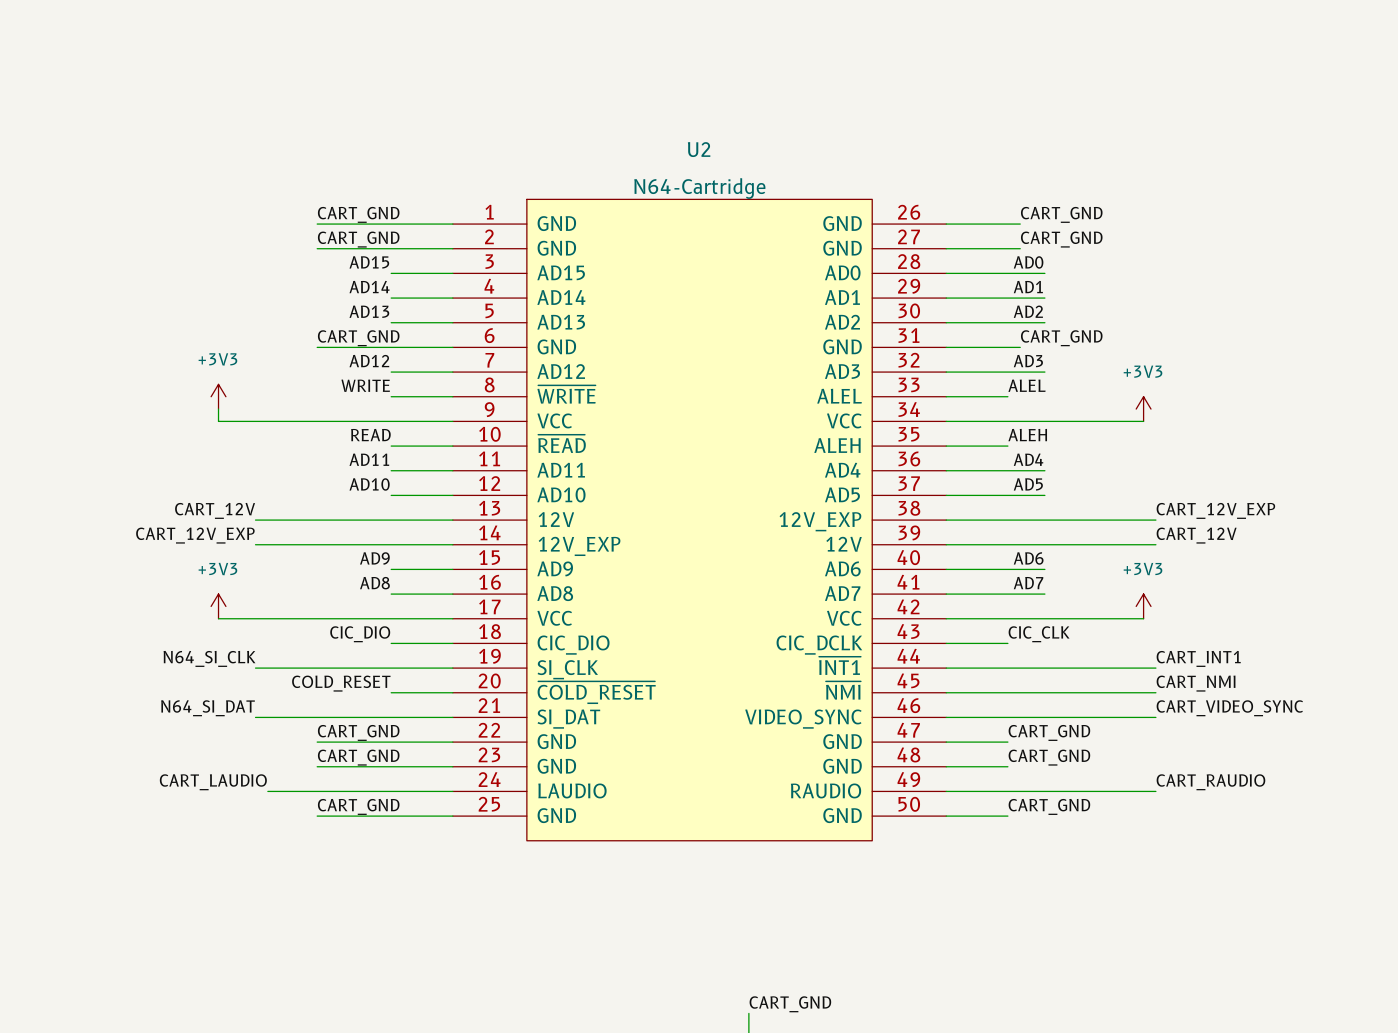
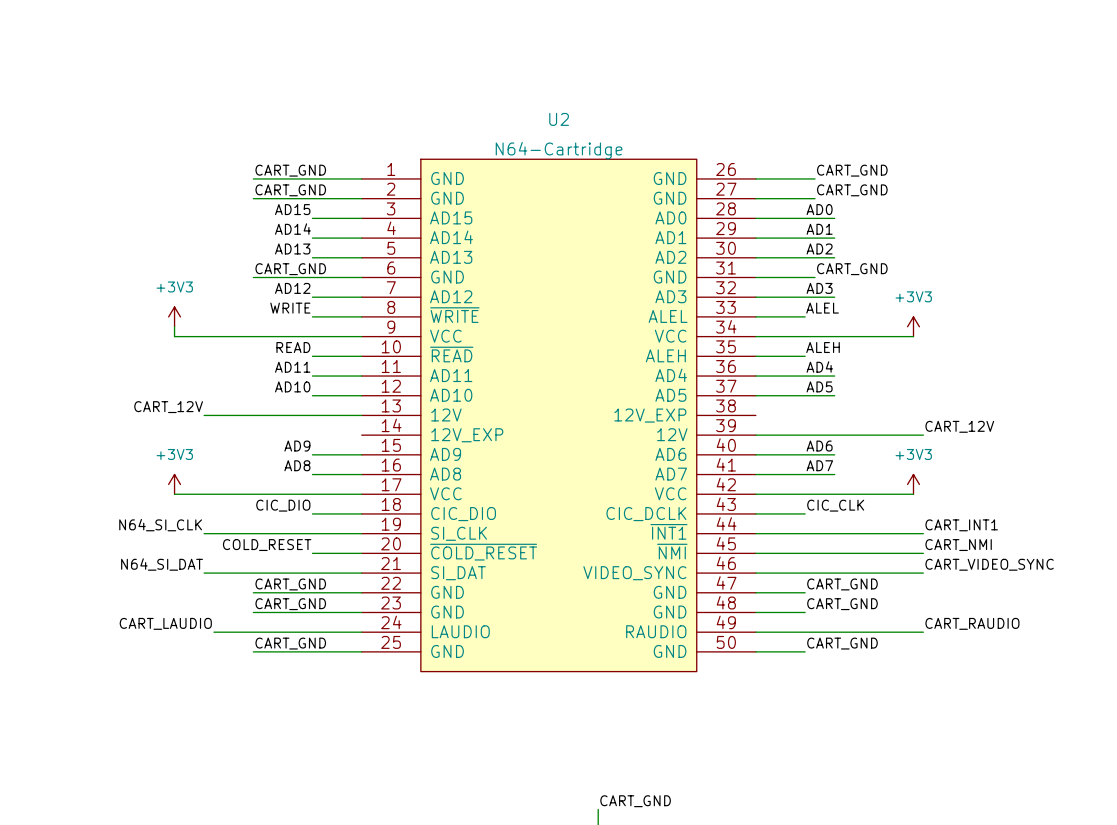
label: CART_12V_EXP (1215, 510) -> none
wire: (946, 520) (1155, 520) -> none
label: CART_12V_EXP (195, 535) -> none
wire: (255, 544) (452, 544) -> none

